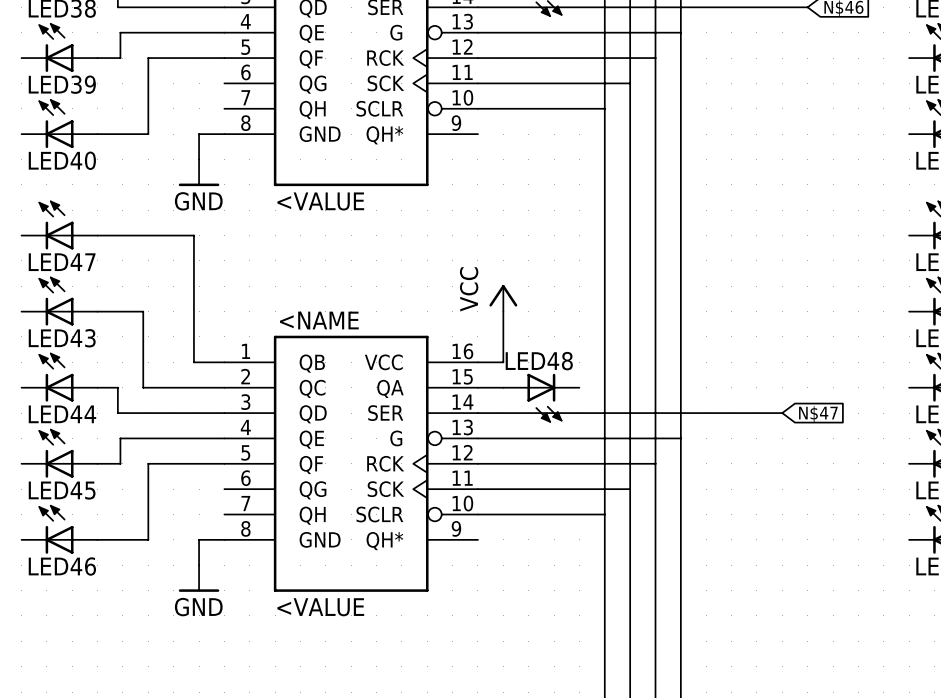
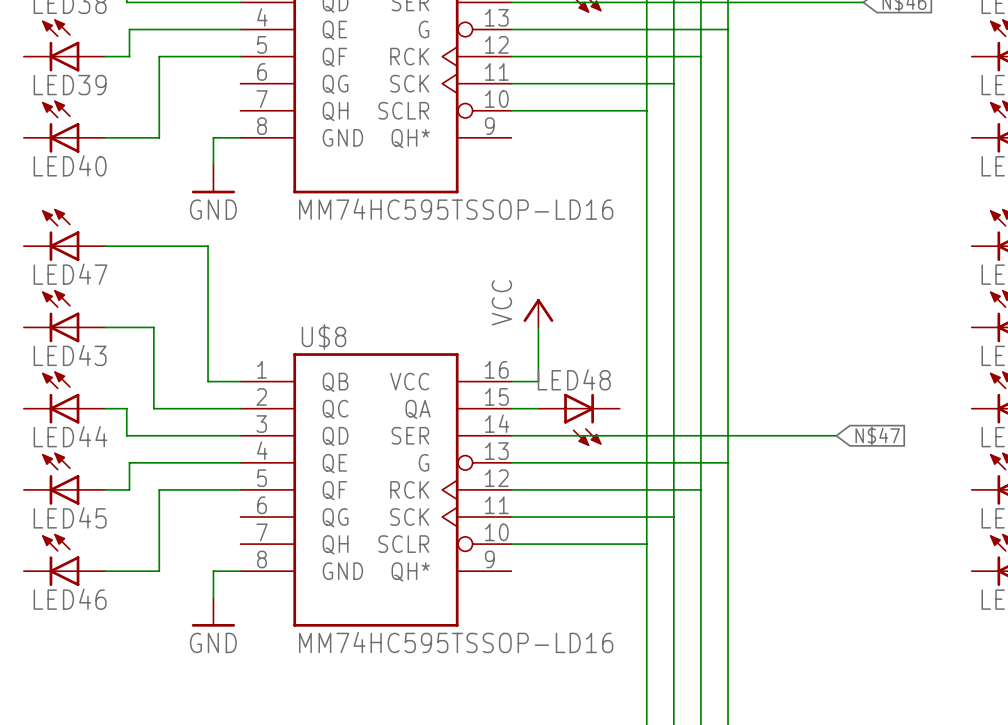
part text: <VALUE (320, 201) -> none
part value: none -> MM74HC595TSSOP-LD16 (456, 209)
U$8 text: <NAME (319, 320) -> none
U$8 name: none -> U$8 (323, 336)
U$8 text: <VALUE (320, 607) -> none
U$8 value: none -> MM74HC595TSSOP-LD16 (456, 642)

